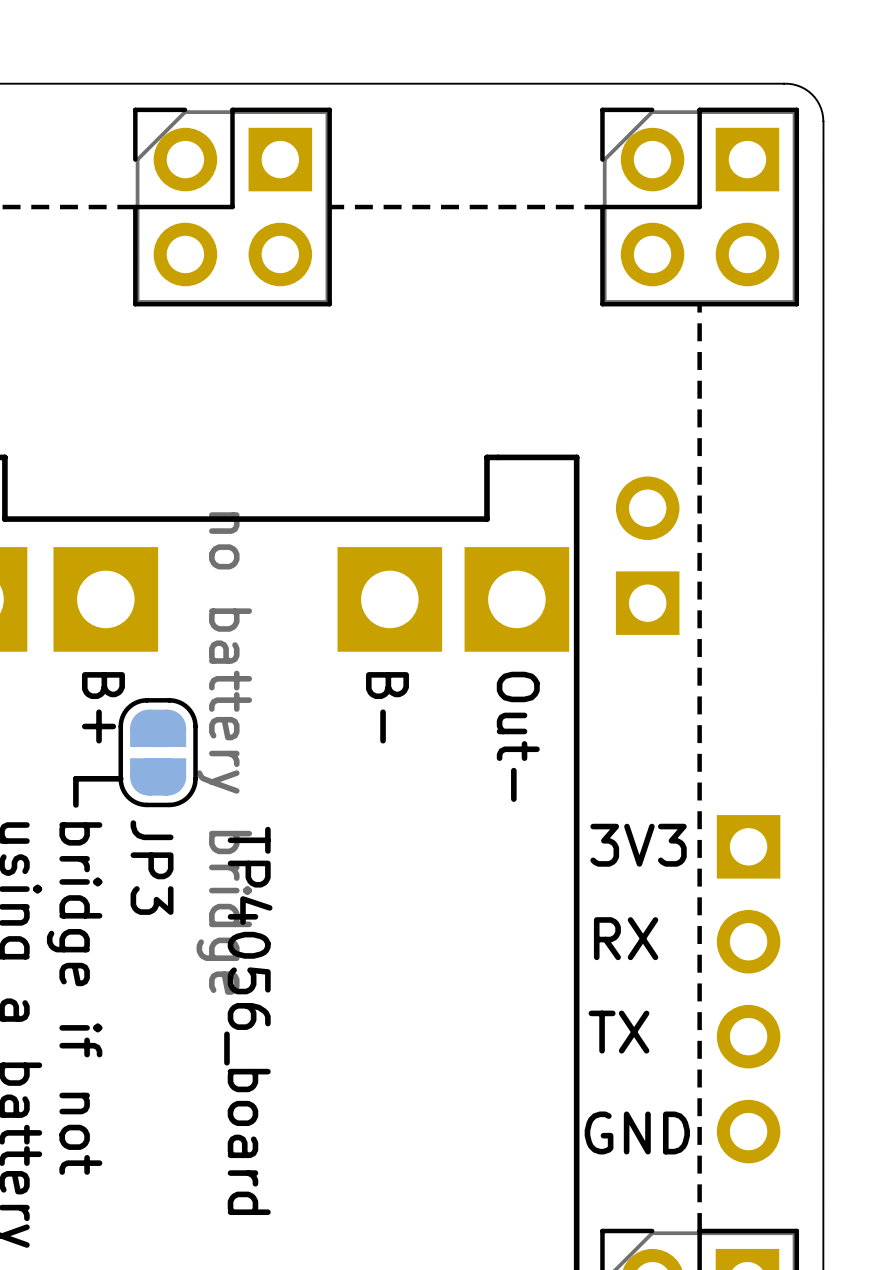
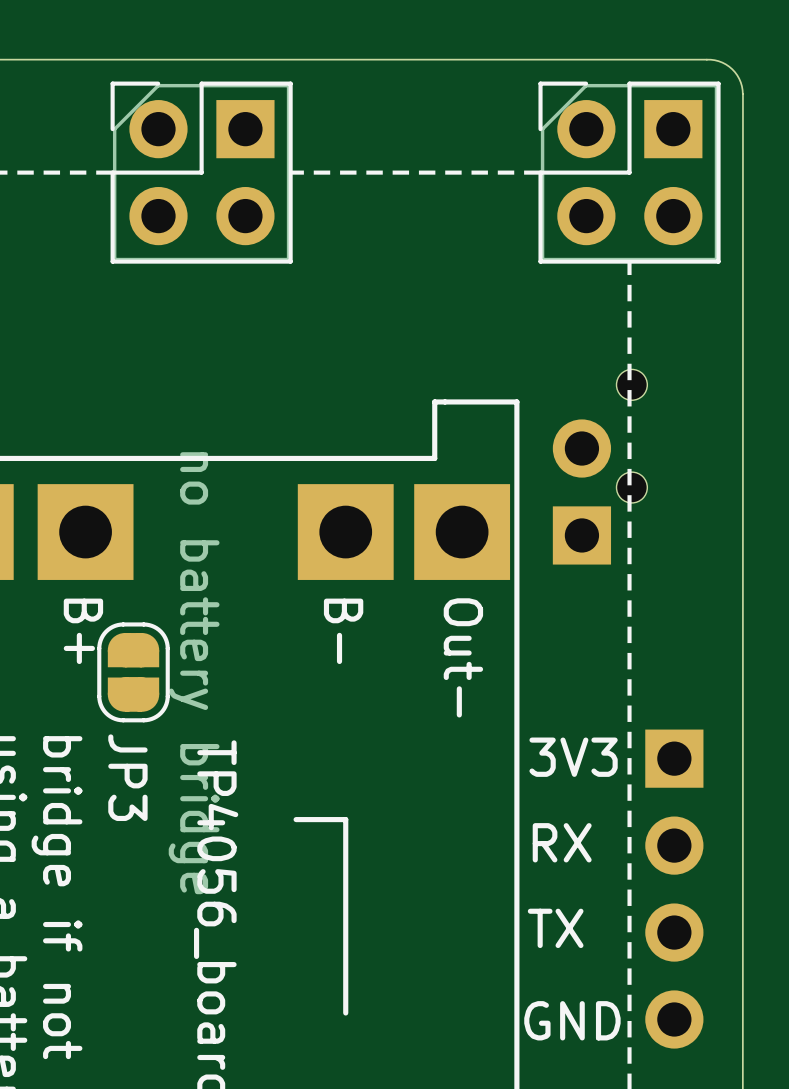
part: none -> (631, 436)
line: (120, 778) (75, 778) (75, 804) -> none
line: none -> (296, 819) (345, 819) (345, 1012)

